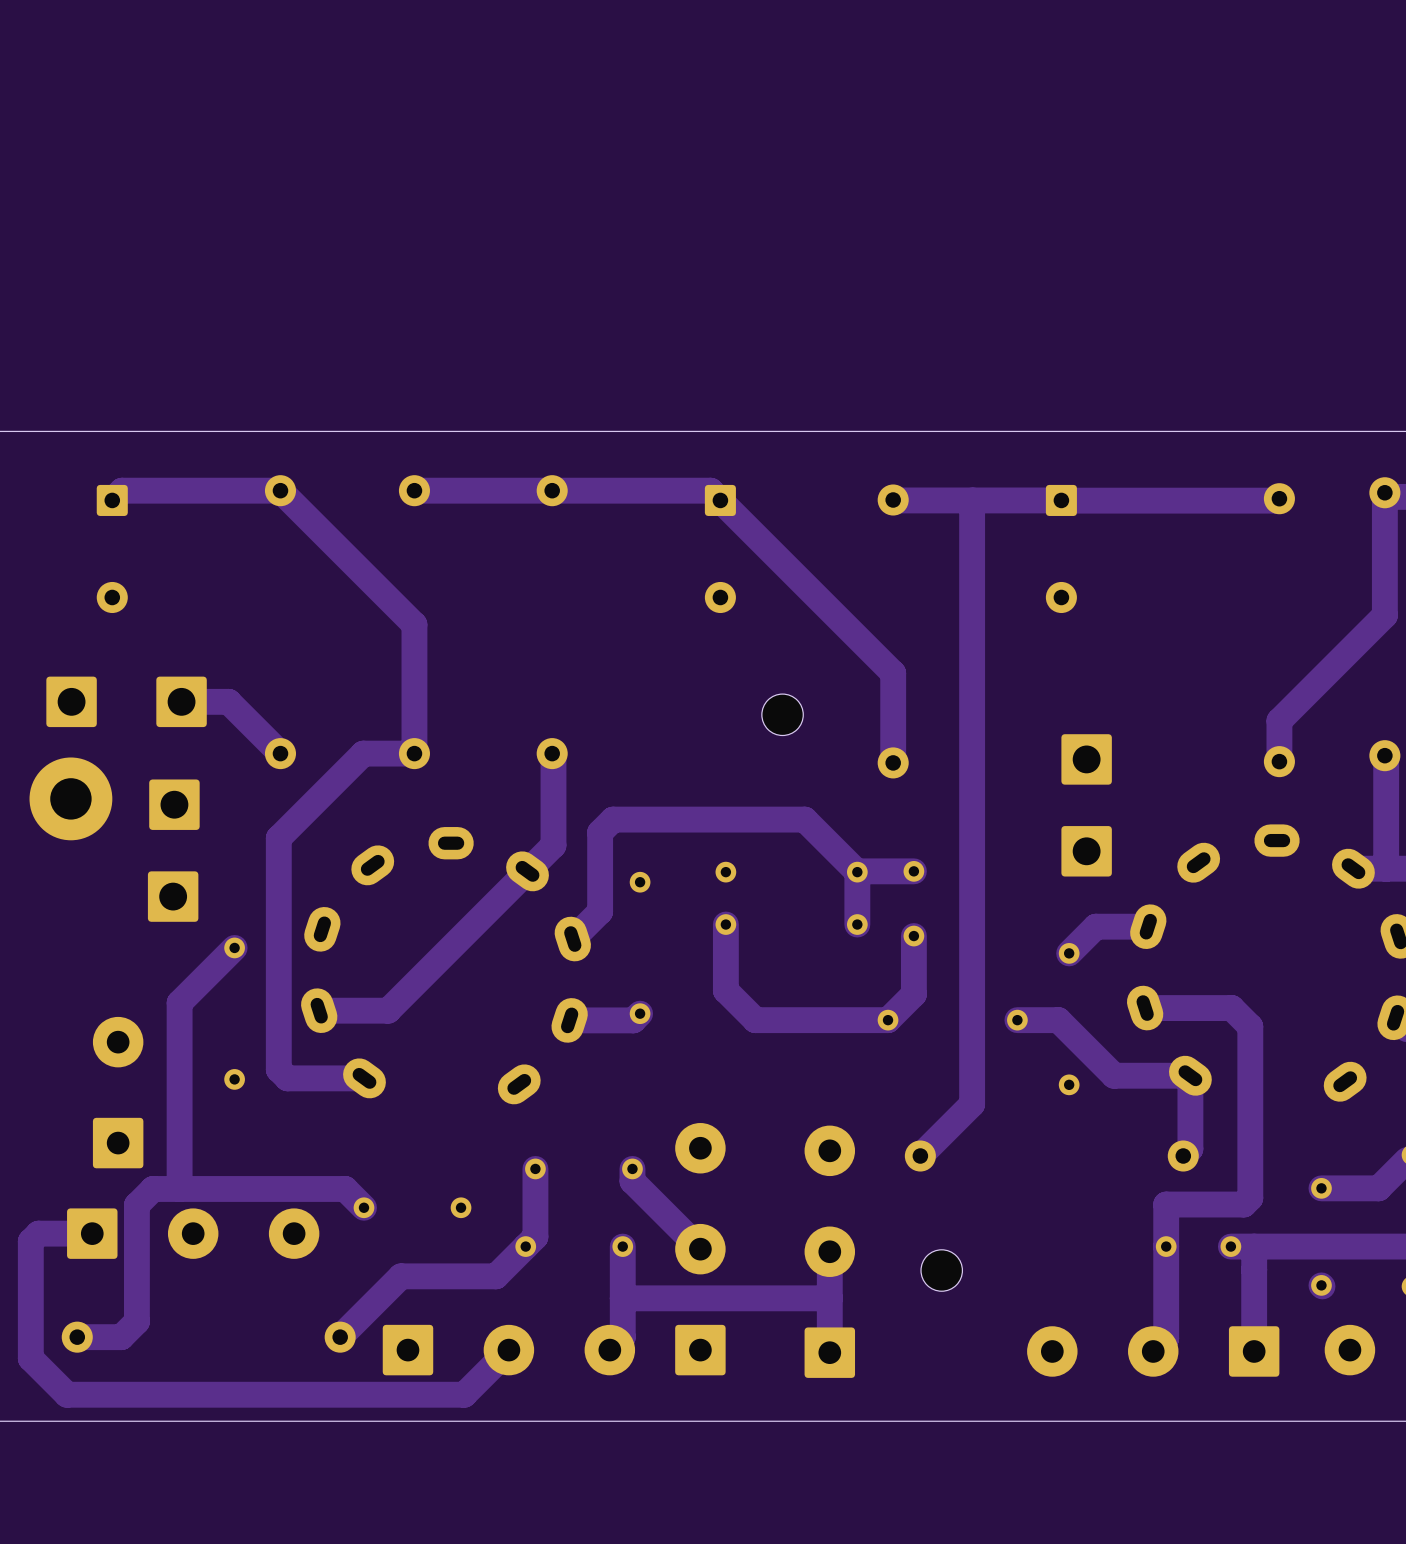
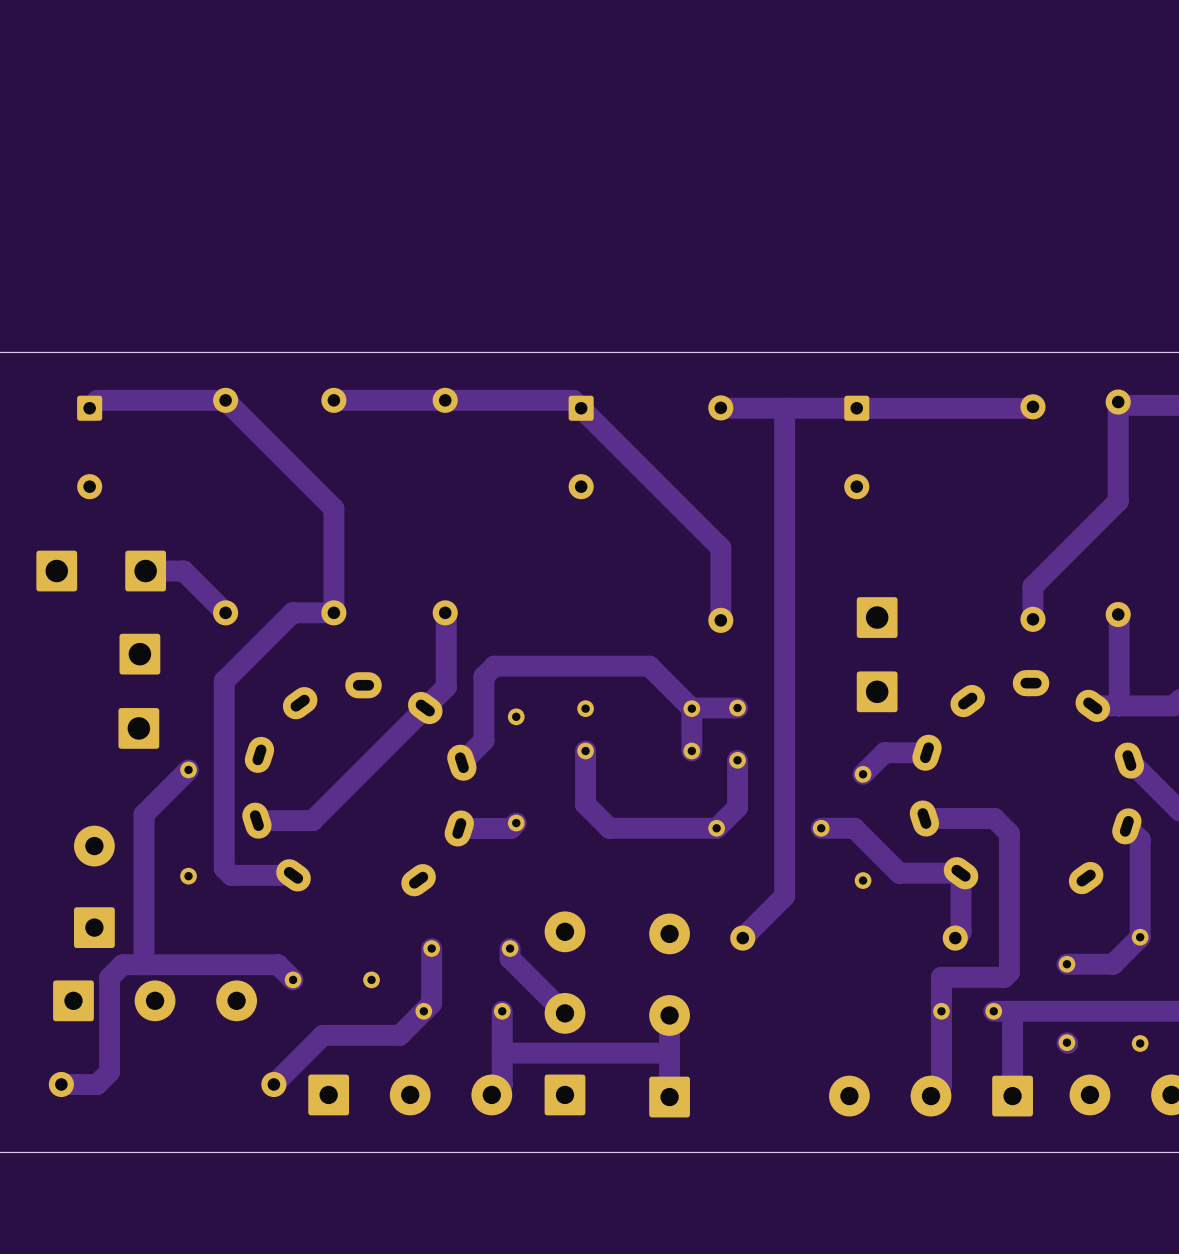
part: (782, 714) -> none
part: (70, 798) -> none
track: (92, 1233) (38, 1233) (30, 1241) (30, 1358) (67, 1394) (464, 1394) (508, 1350) -> none
part: (941, 1270) -> none

